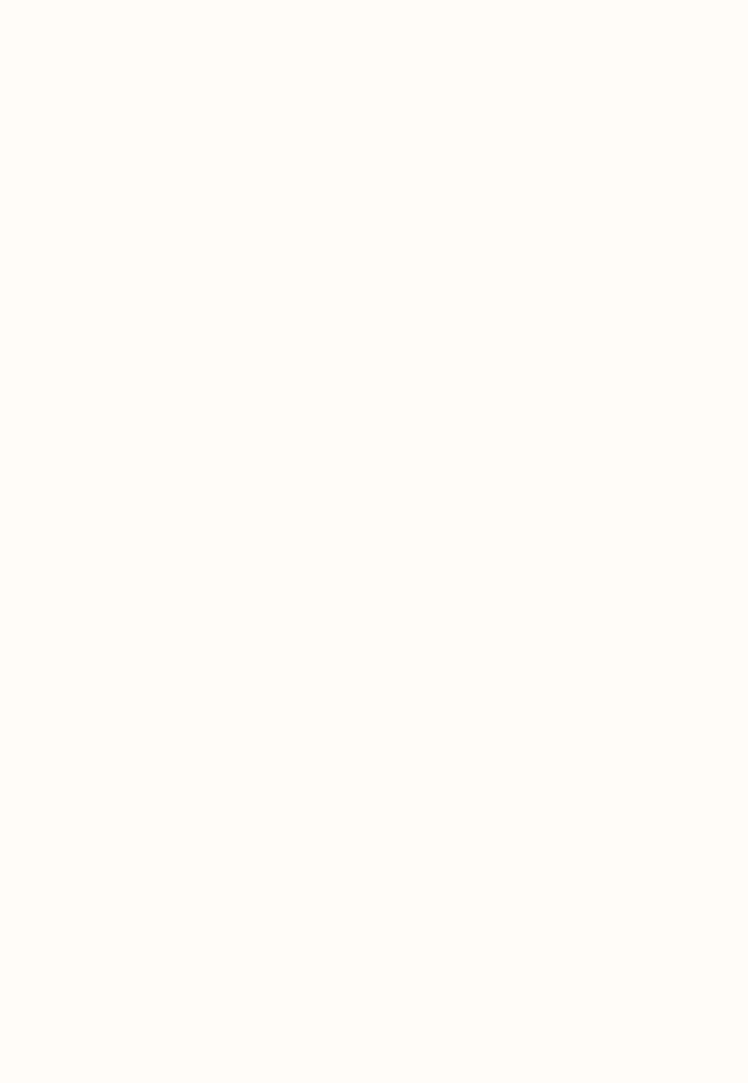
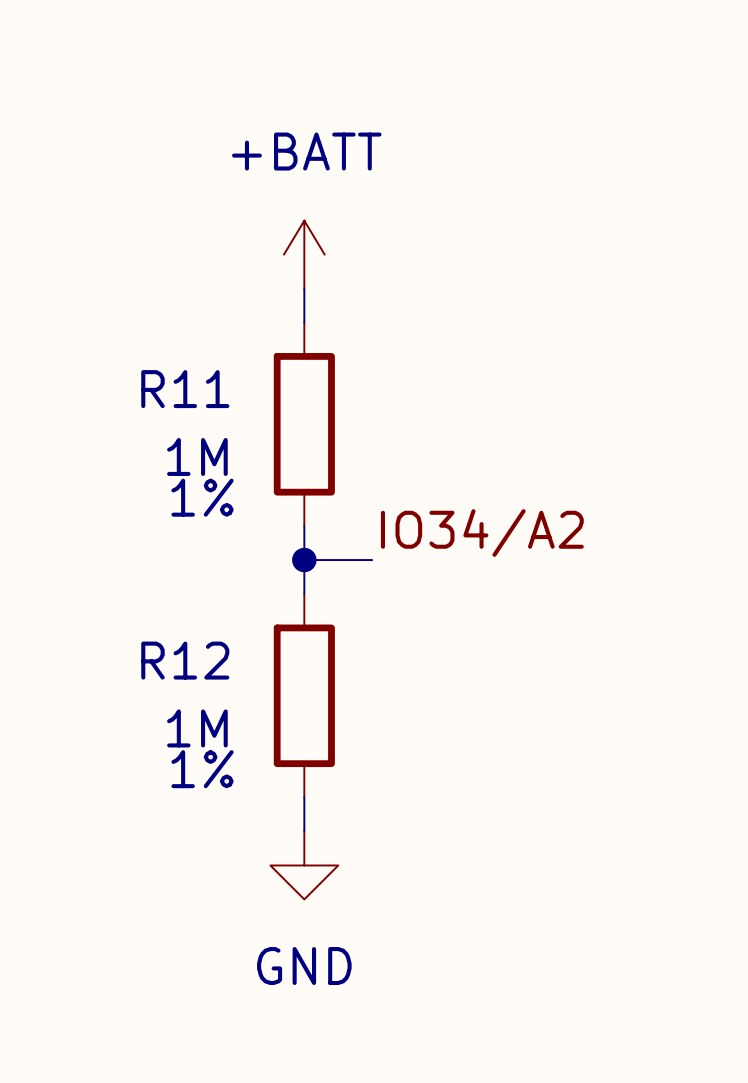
power symbol: none -> +BATT (304, 254)
wire: none -> (304, 288) (304, 322)
R11: none -> 1M (304, 424)
wire: none -> (304, 526) (304, 593)
label: none -> IO34/A2 (482, 532)
wire: none -> (304, 560) (372, 560)
junction: none -> (304, 560)
R12: none -> 1M (304, 695)
wire: none -> (304, 797) (304, 831)
power symbol: none -> GND (304, 865)

